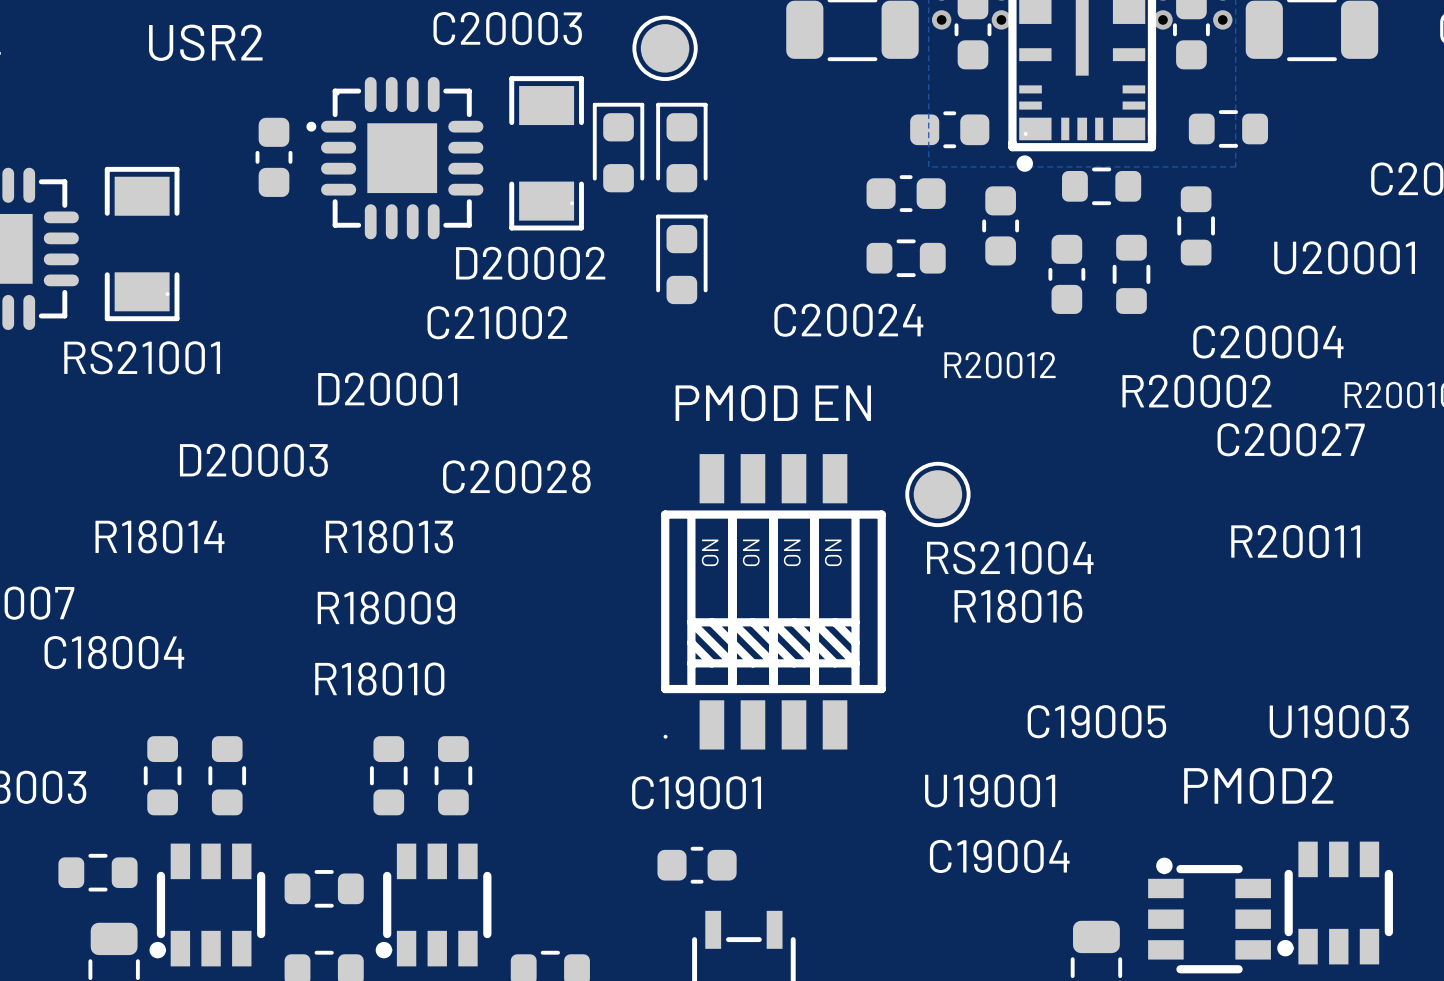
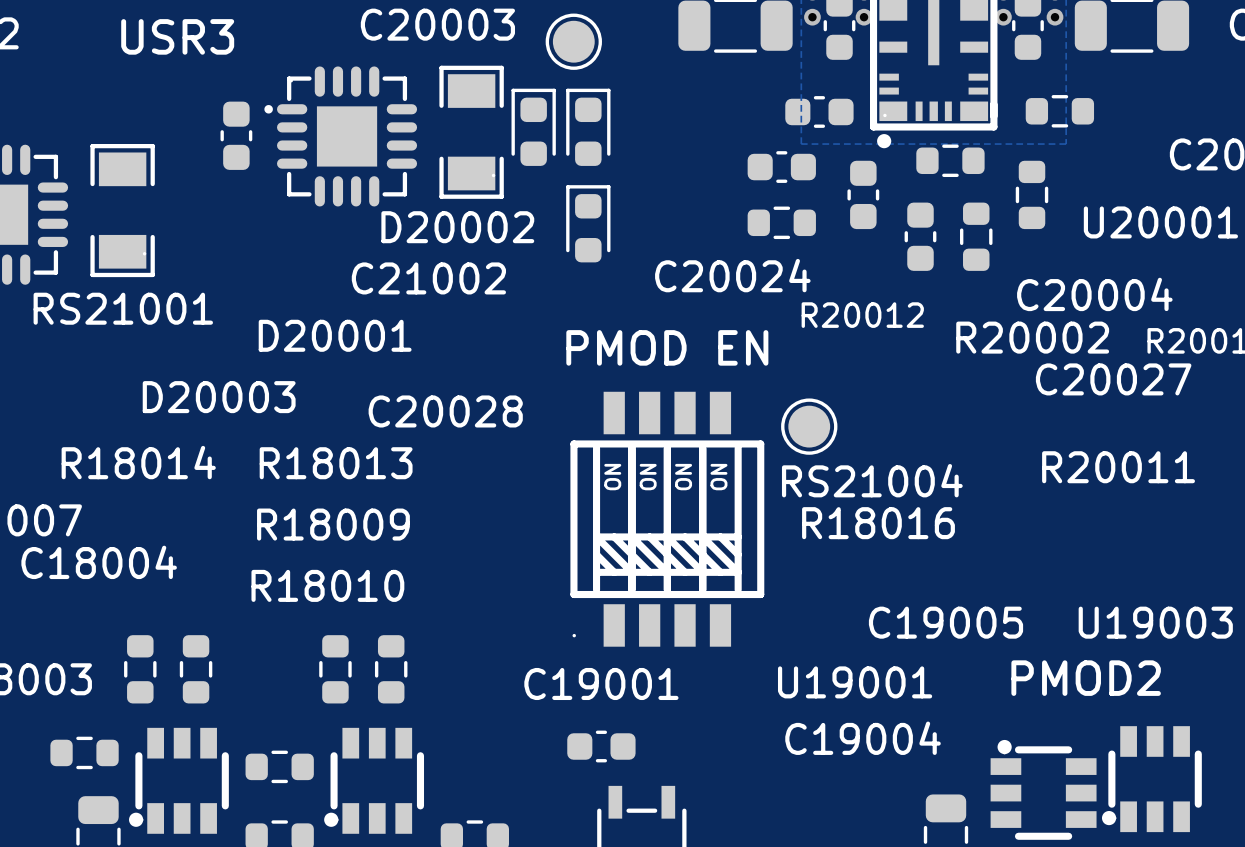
text: USR2 (205, 42) -> USR3 (177, 36)

